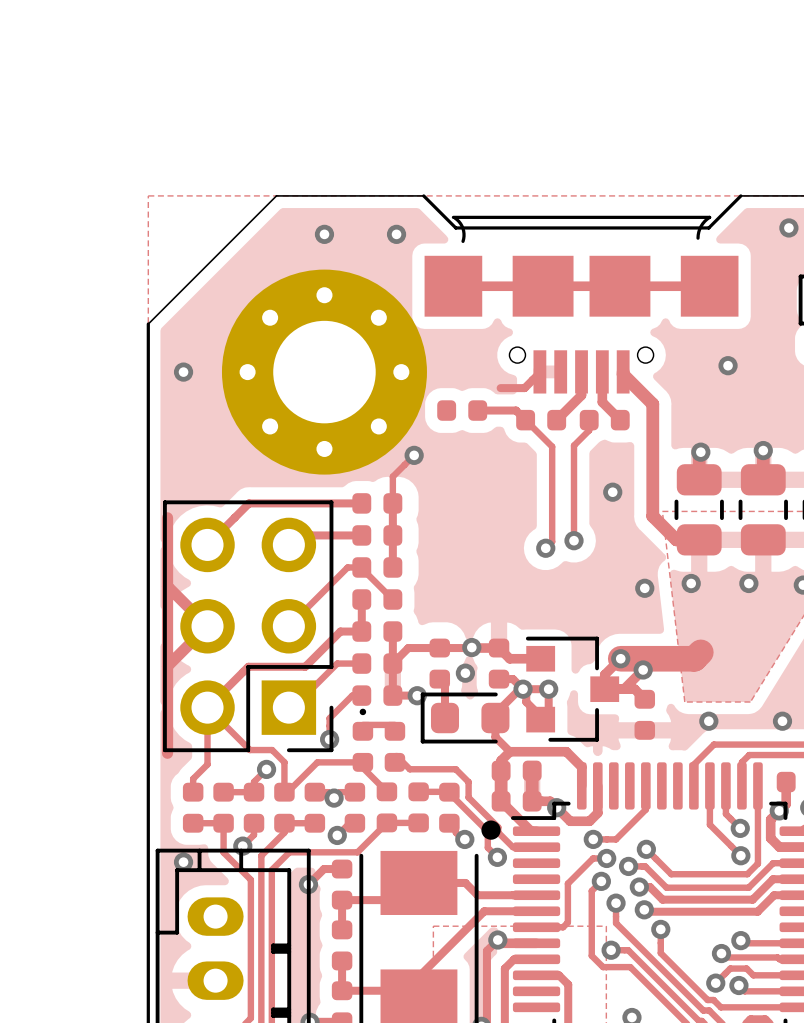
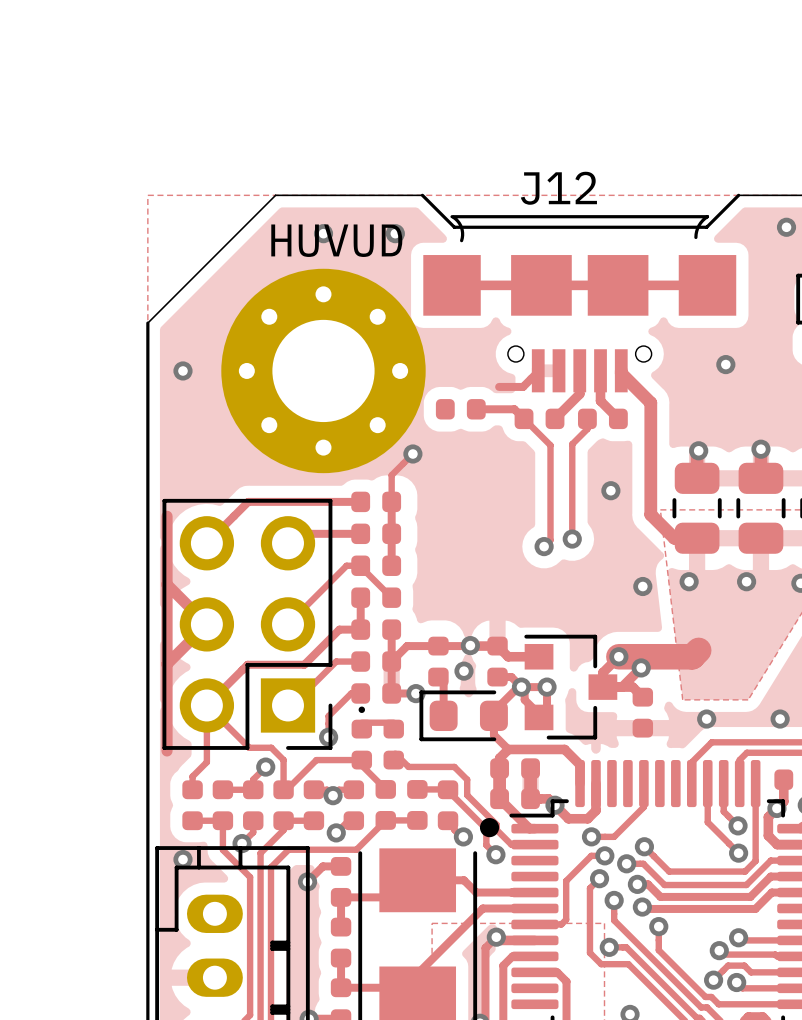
J12 name: none -> J12 (558, 188)
text: none -> HUVUD (336, 240)

